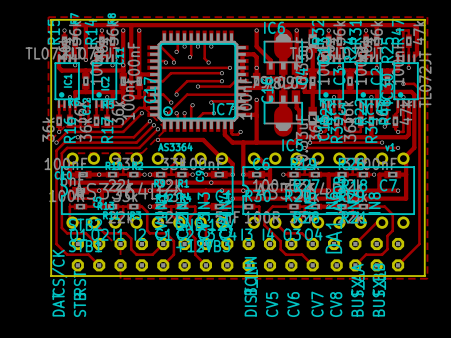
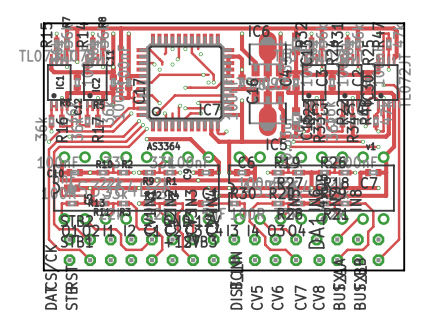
zone outline: (48, 17) (427, 17) (427, 278) (120, 278) (120, 249) (93, 222) (69, 222) (69, 161) (77, 153) (141, 153) (165, 129) (144, 107) (139, 107) (120, 126) (64, 126) (51, 139) (48, 139) (48, 17) -> none
via: (211, 46) -> none
track: (204, 50) (204, 58) (208, 62) -> (191, 52) (213, 74) (213, 82)
via: (176, 51) -> none
via: none -> (200, 54)
via: (173, 62) -> none
via: none -> (172, 64)
via: (208, 62) -> none
track: (160, 67) (229, 67) -> none
via: none -> (159, 69)
via: (229, 67) -> none
via: none -> (203, 74)
via: (221, 73) -> none
track: (221, 81) (187, 81) (176, 91) (176, 94) -> none
via: none -> (213, 82)
via: (176, 94) -> none
track: none -> (185, 108) (203, 108)
via: none -> (185, 108)
via: (184, 113) -> none

